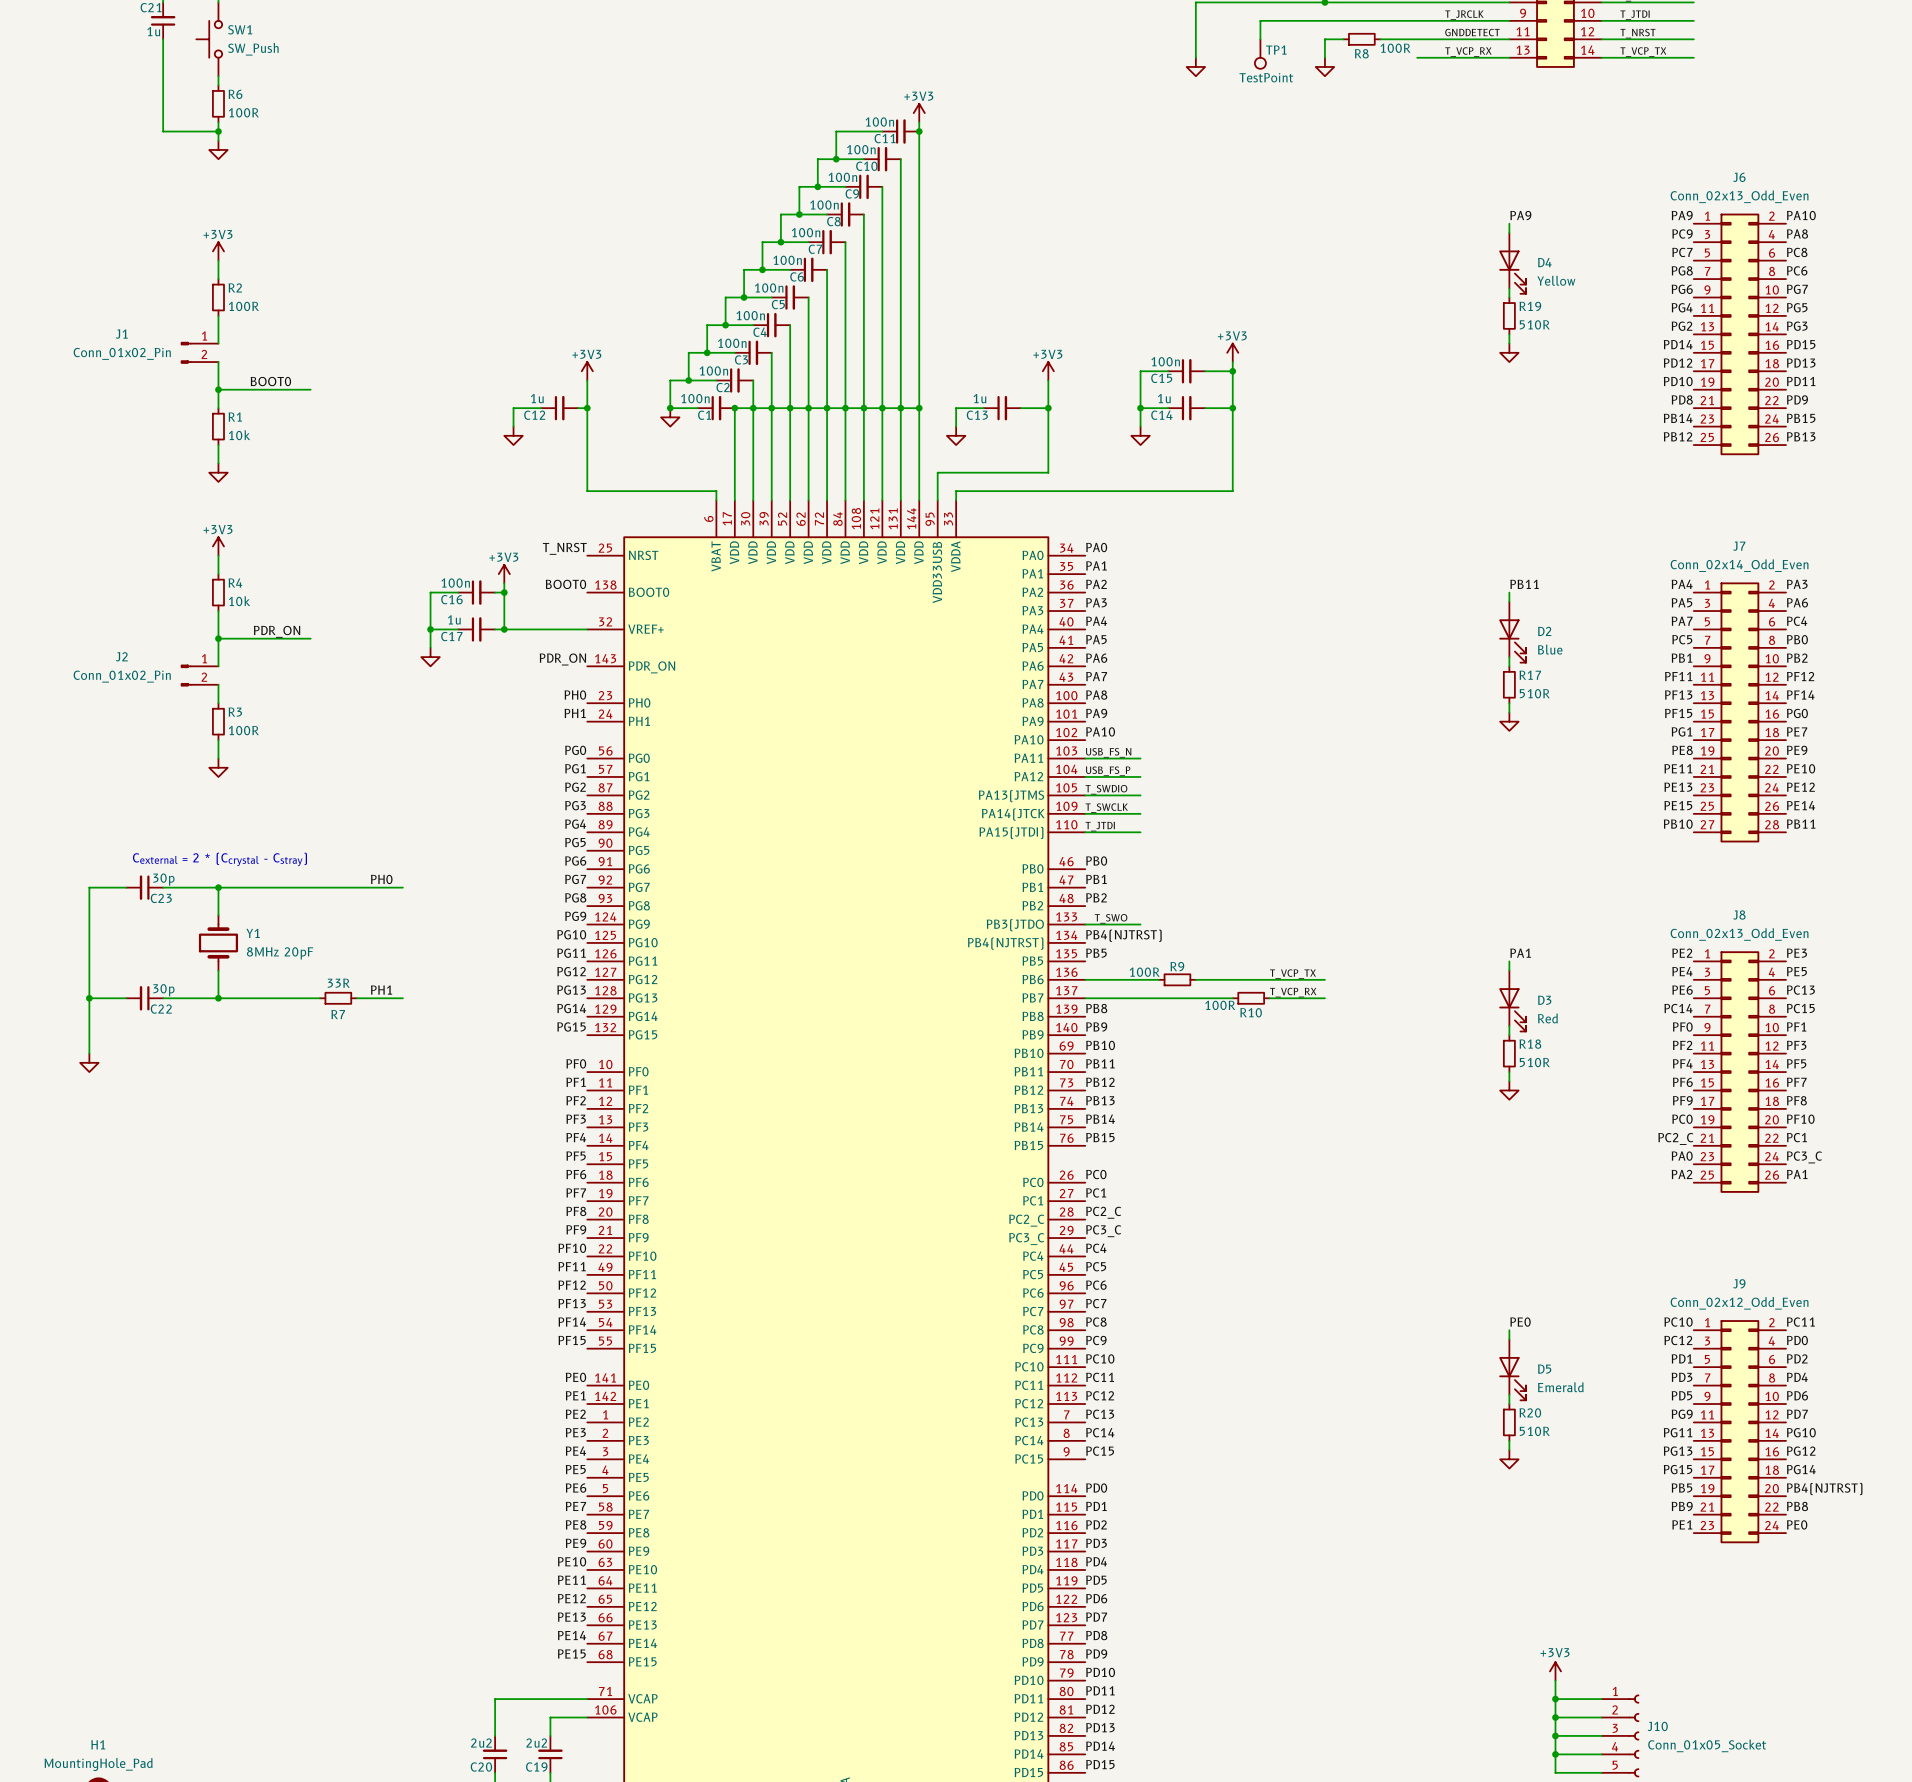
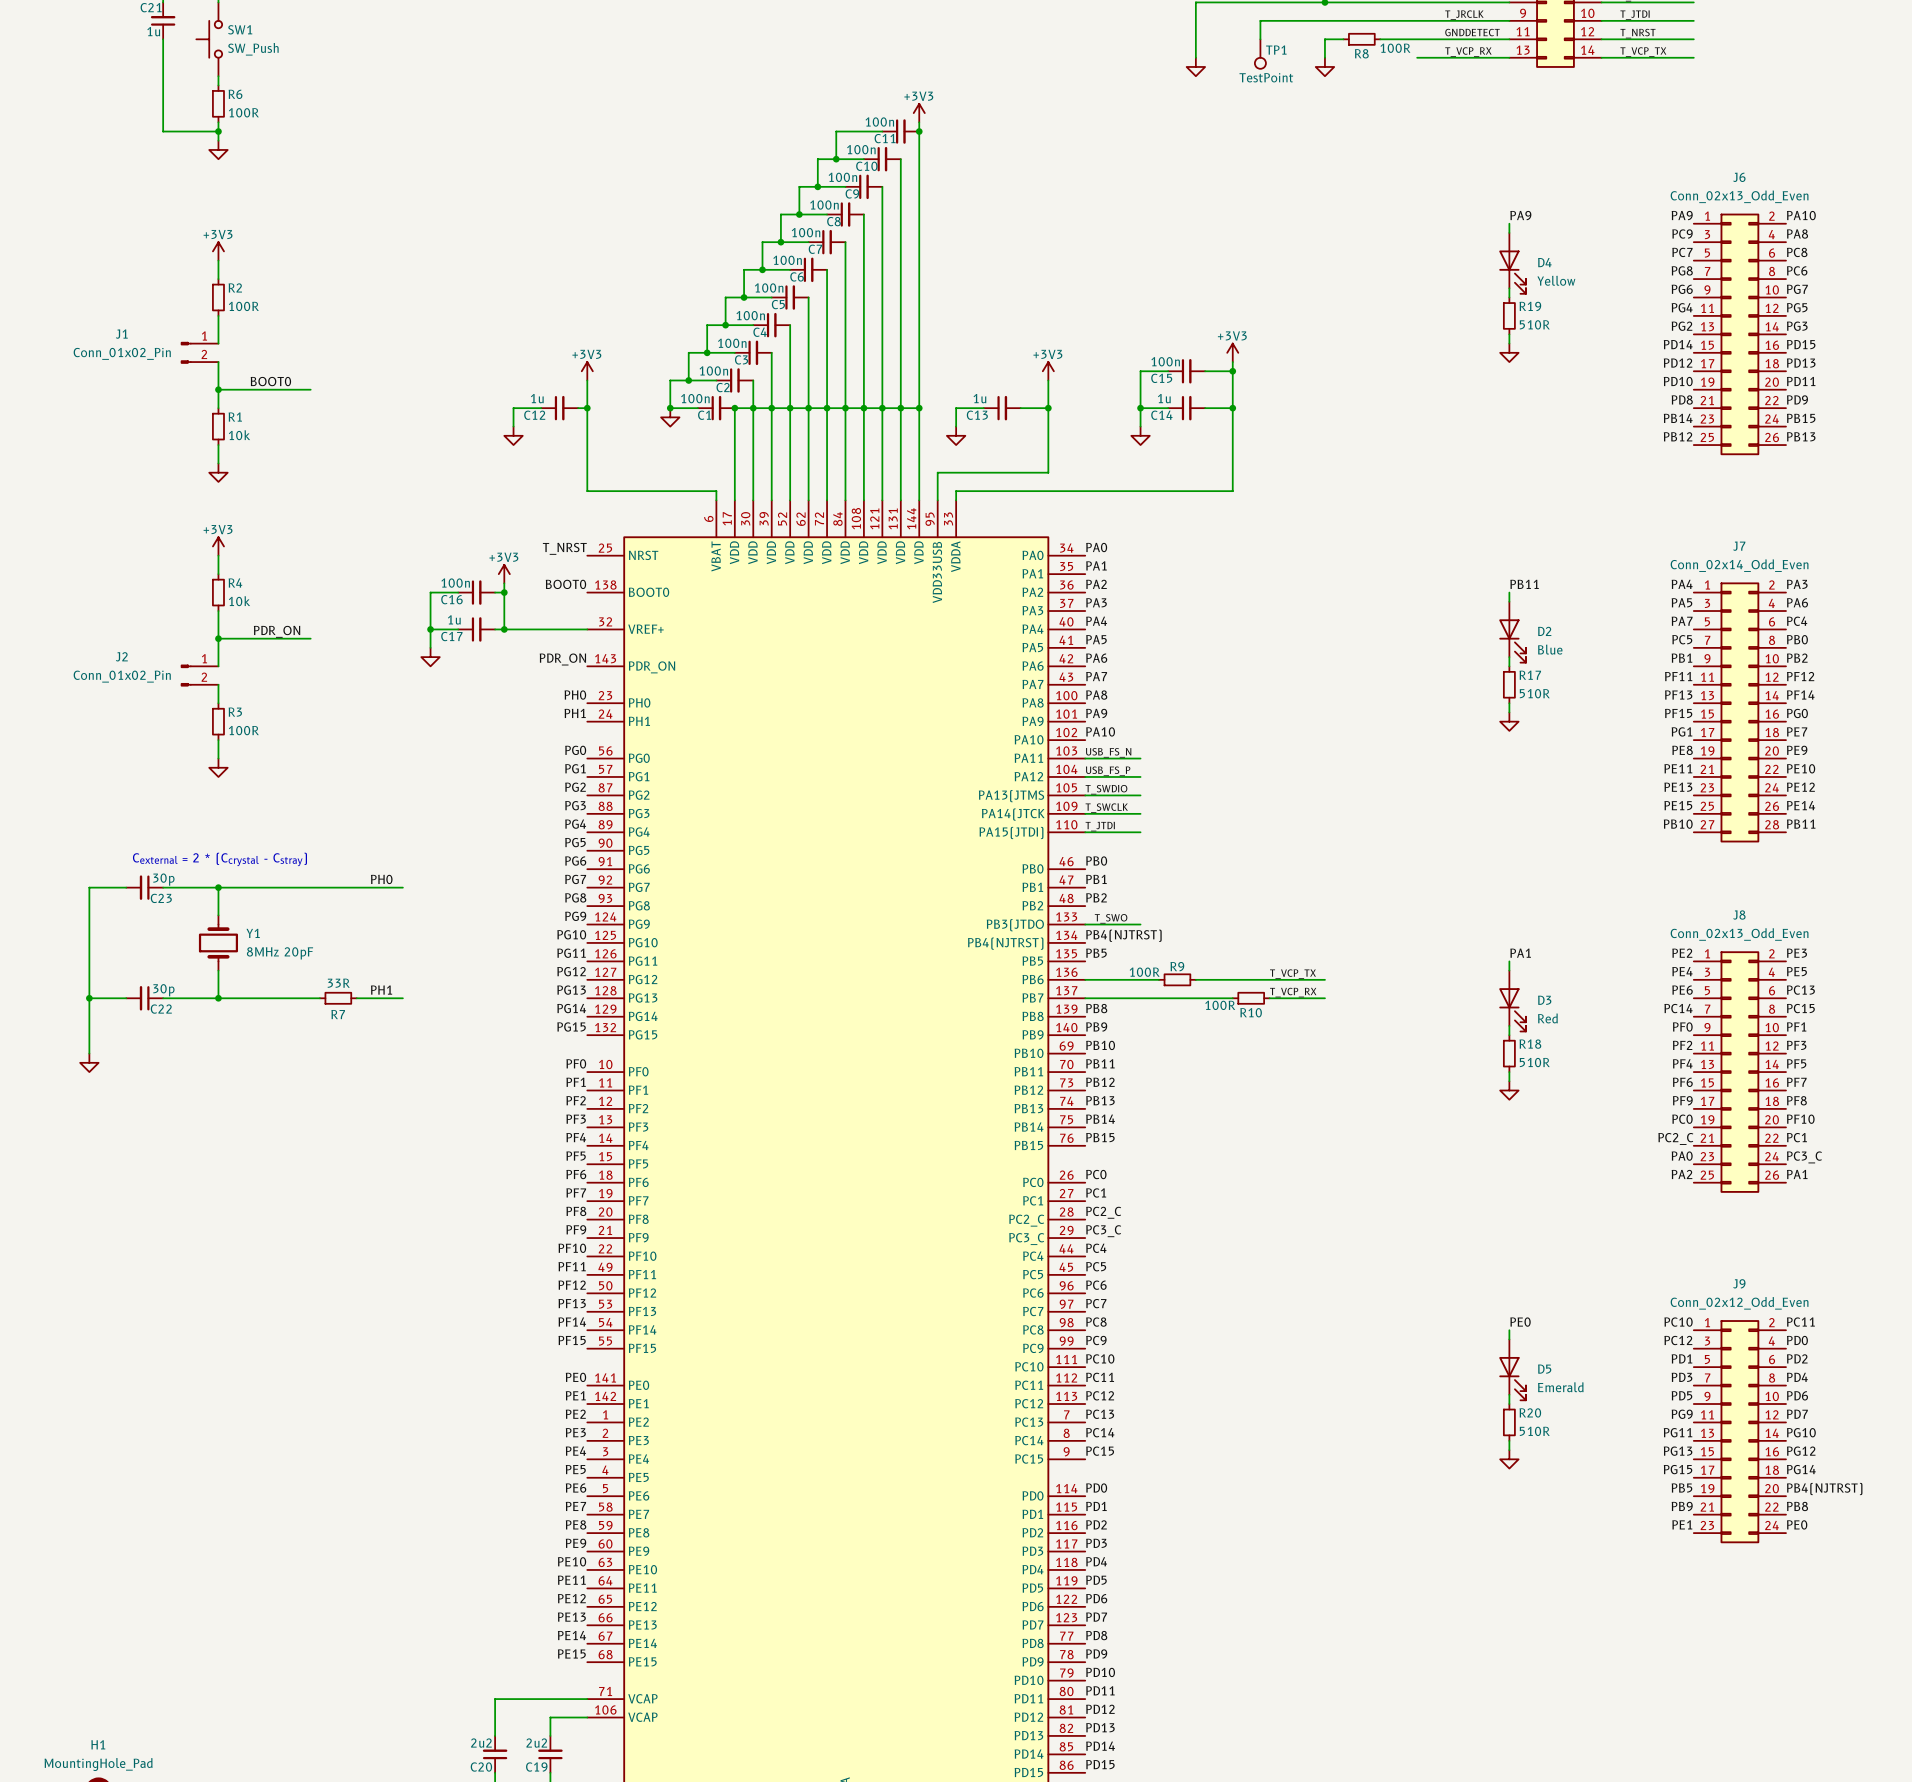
power symbol: +3V3 (1555, 1671) -> none
wire: (1555, 1680) (1555, 1772) (1601, 1772) -> none
wire: (1555, 1699) (1601, 1699) -> none
junction: (1555, 1699) -> none
wire: (1555, 1717) (1601, 1717) -> none
junction: (1555, 1717) -> none
wire: (1555, 1735) (1601, 1735) -> none
junction: (1555, 1735) -> none
J10: Conn_01x05_Socket (1620, 1735) -> none
wire: (1555, 1754) (1601, 1754) -> none
junction: (1555, 1754) -> none

